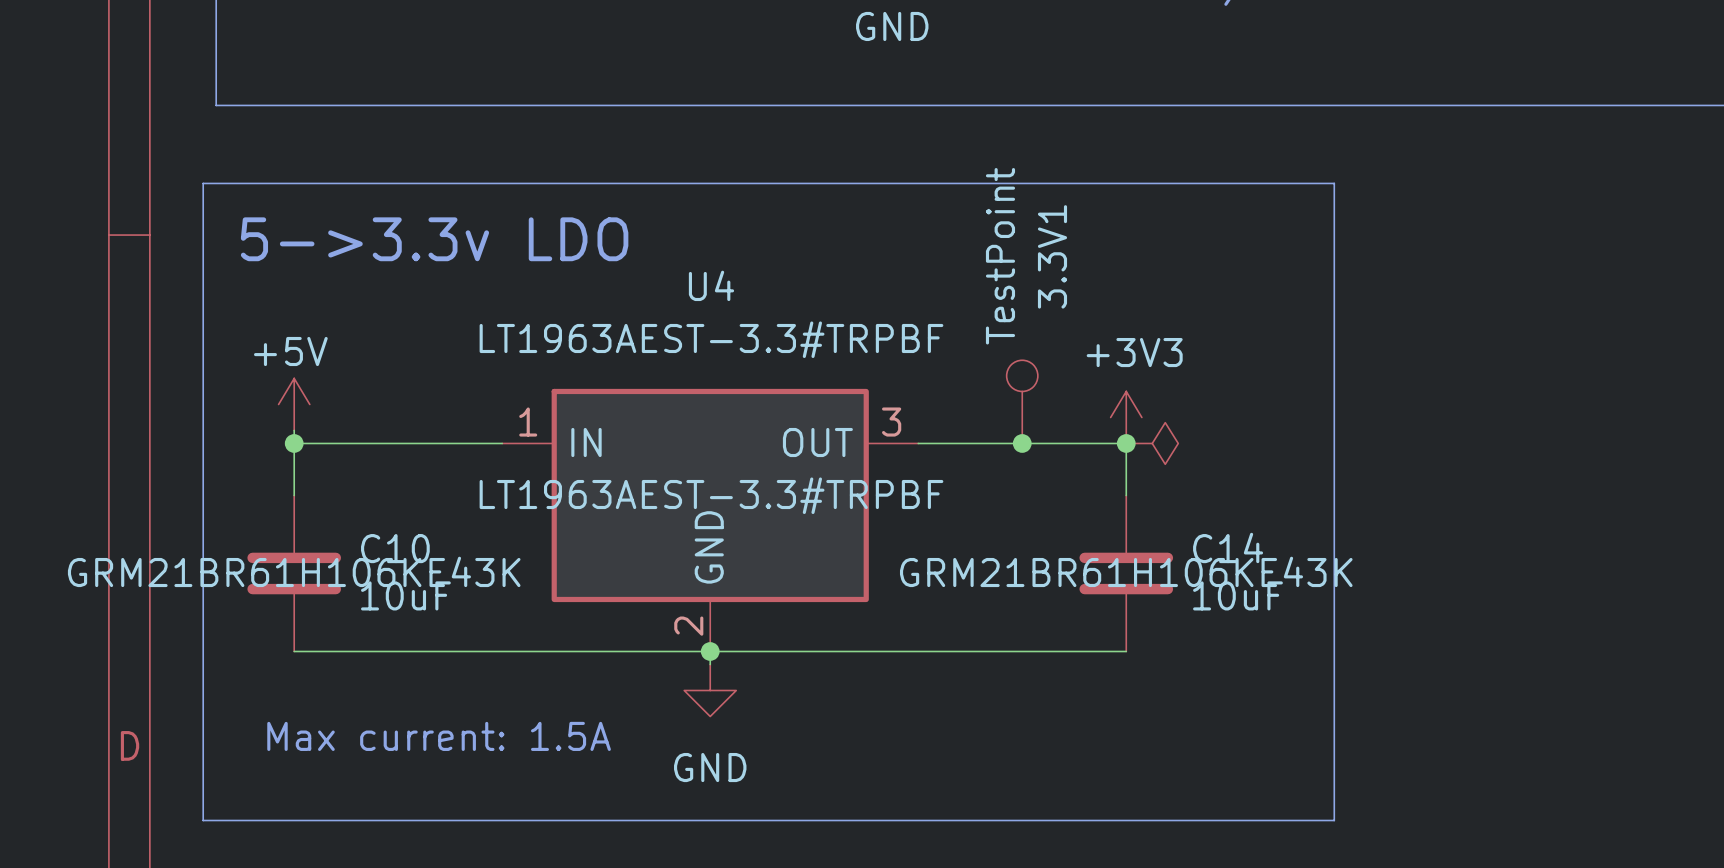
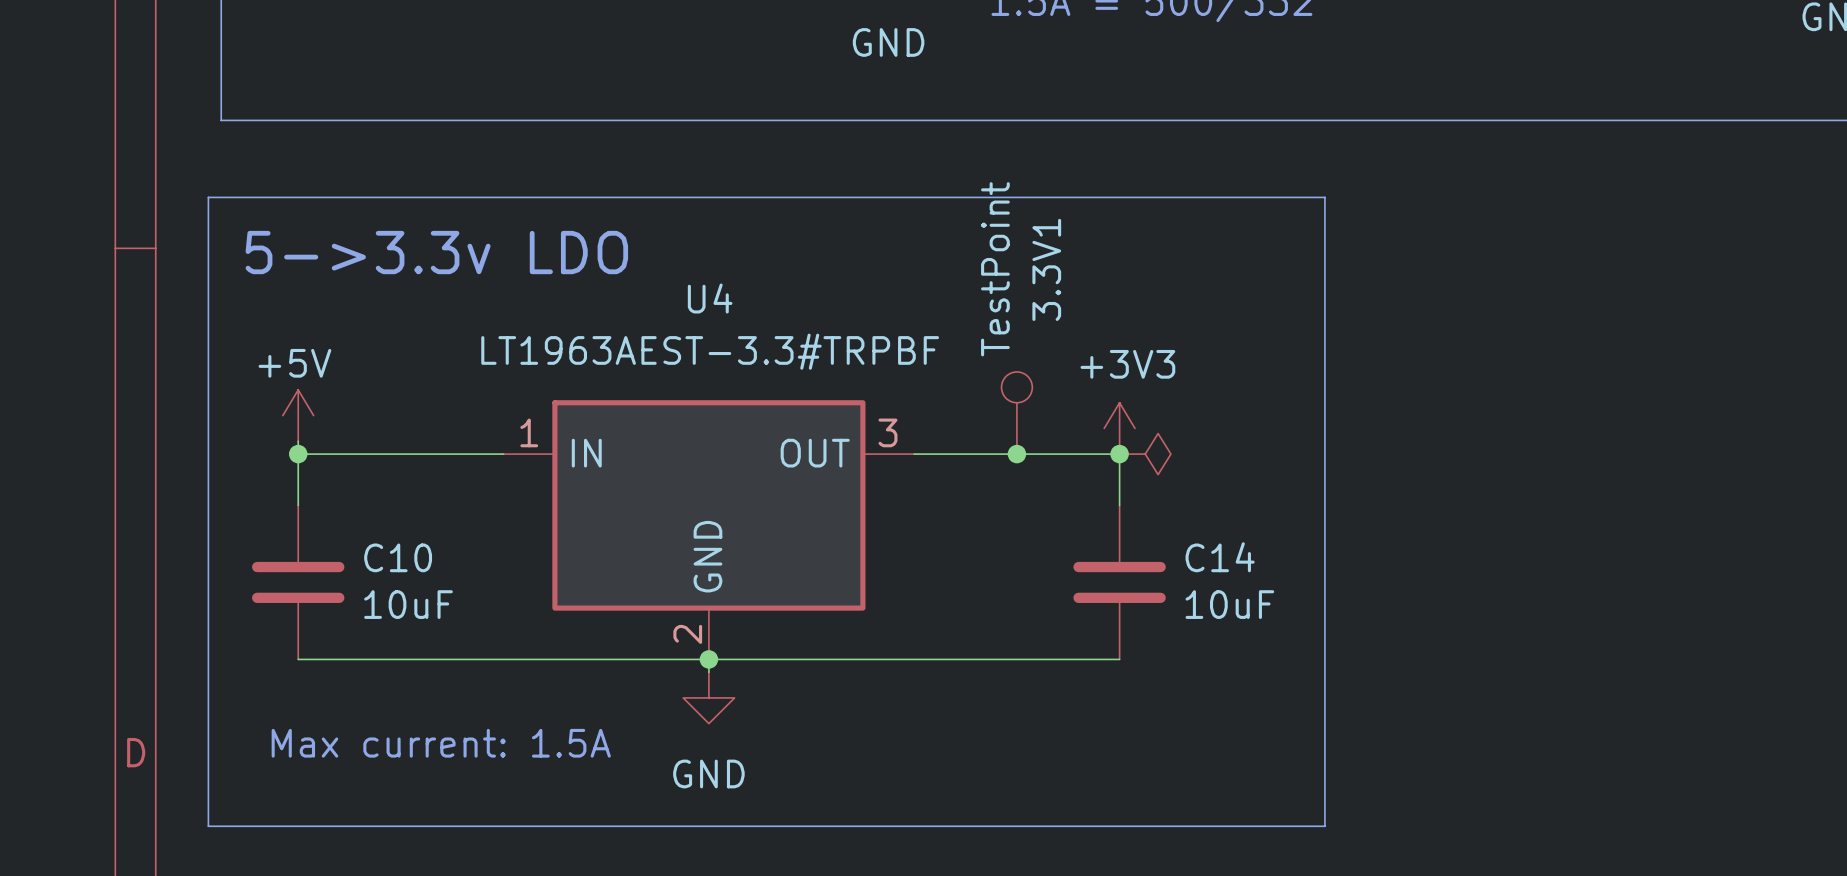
U4 text: LT1963AEST-3.3#TRPBF (711, 495) -> none
C10 text: GRM21BR61H106KE43K (294, 571) -> none
C14 text: GRM21BR61H106KE43K (1126, 571) -> none

